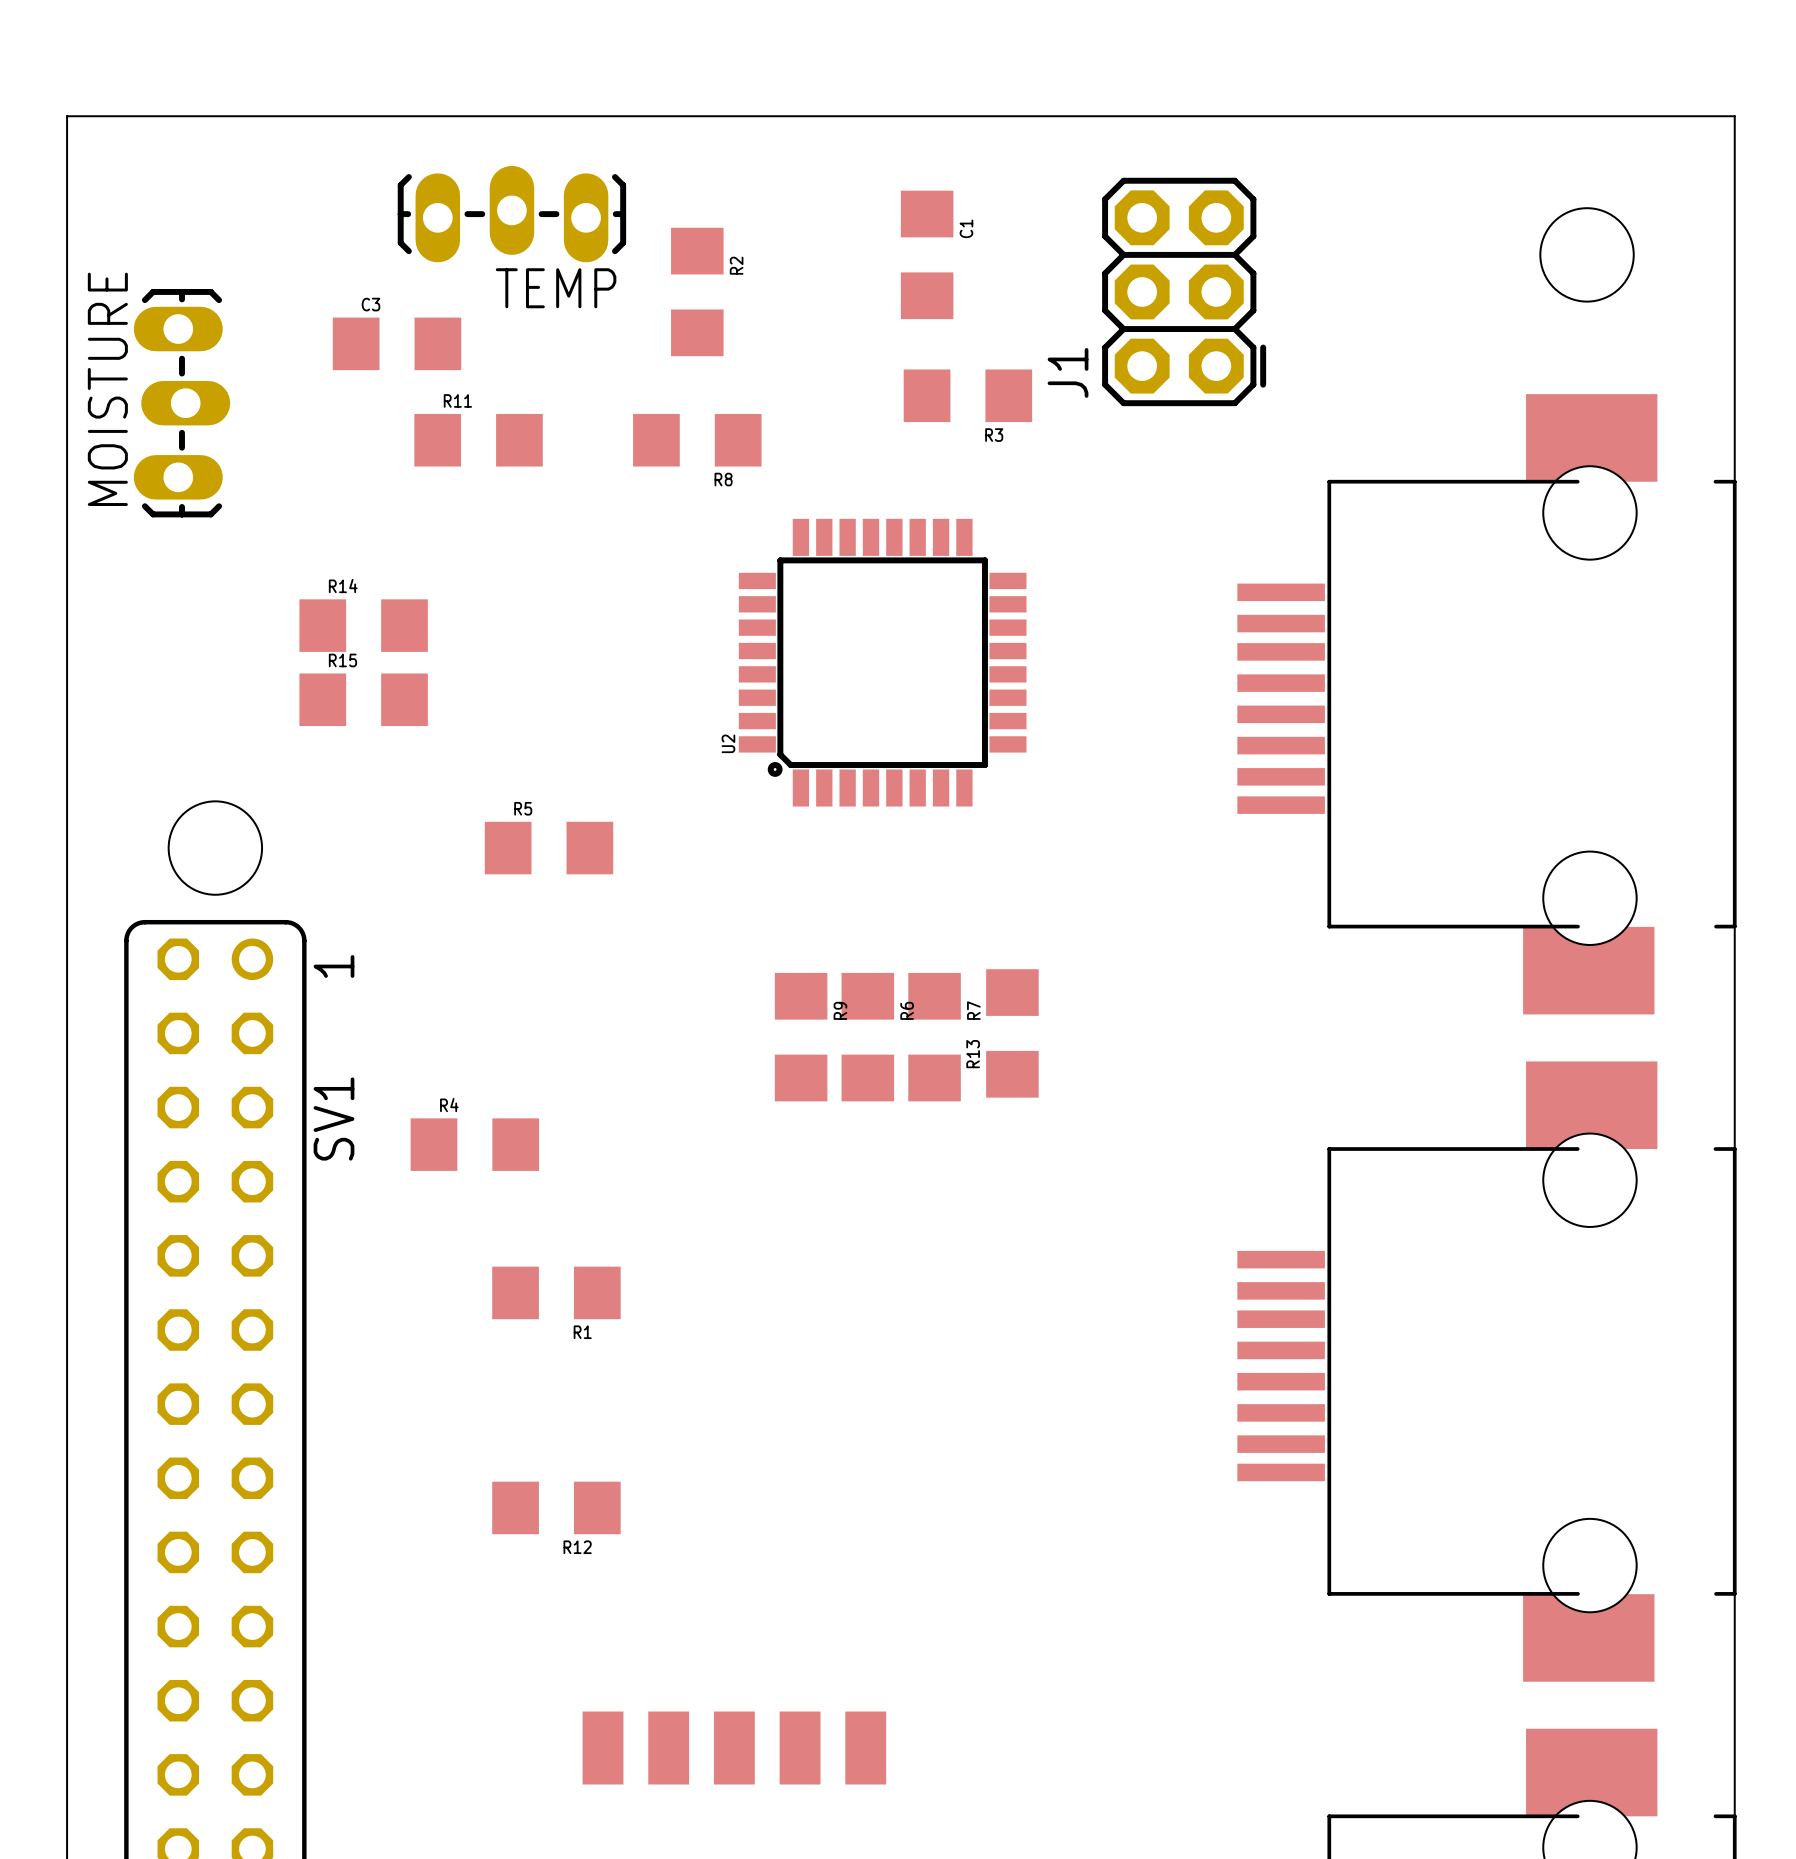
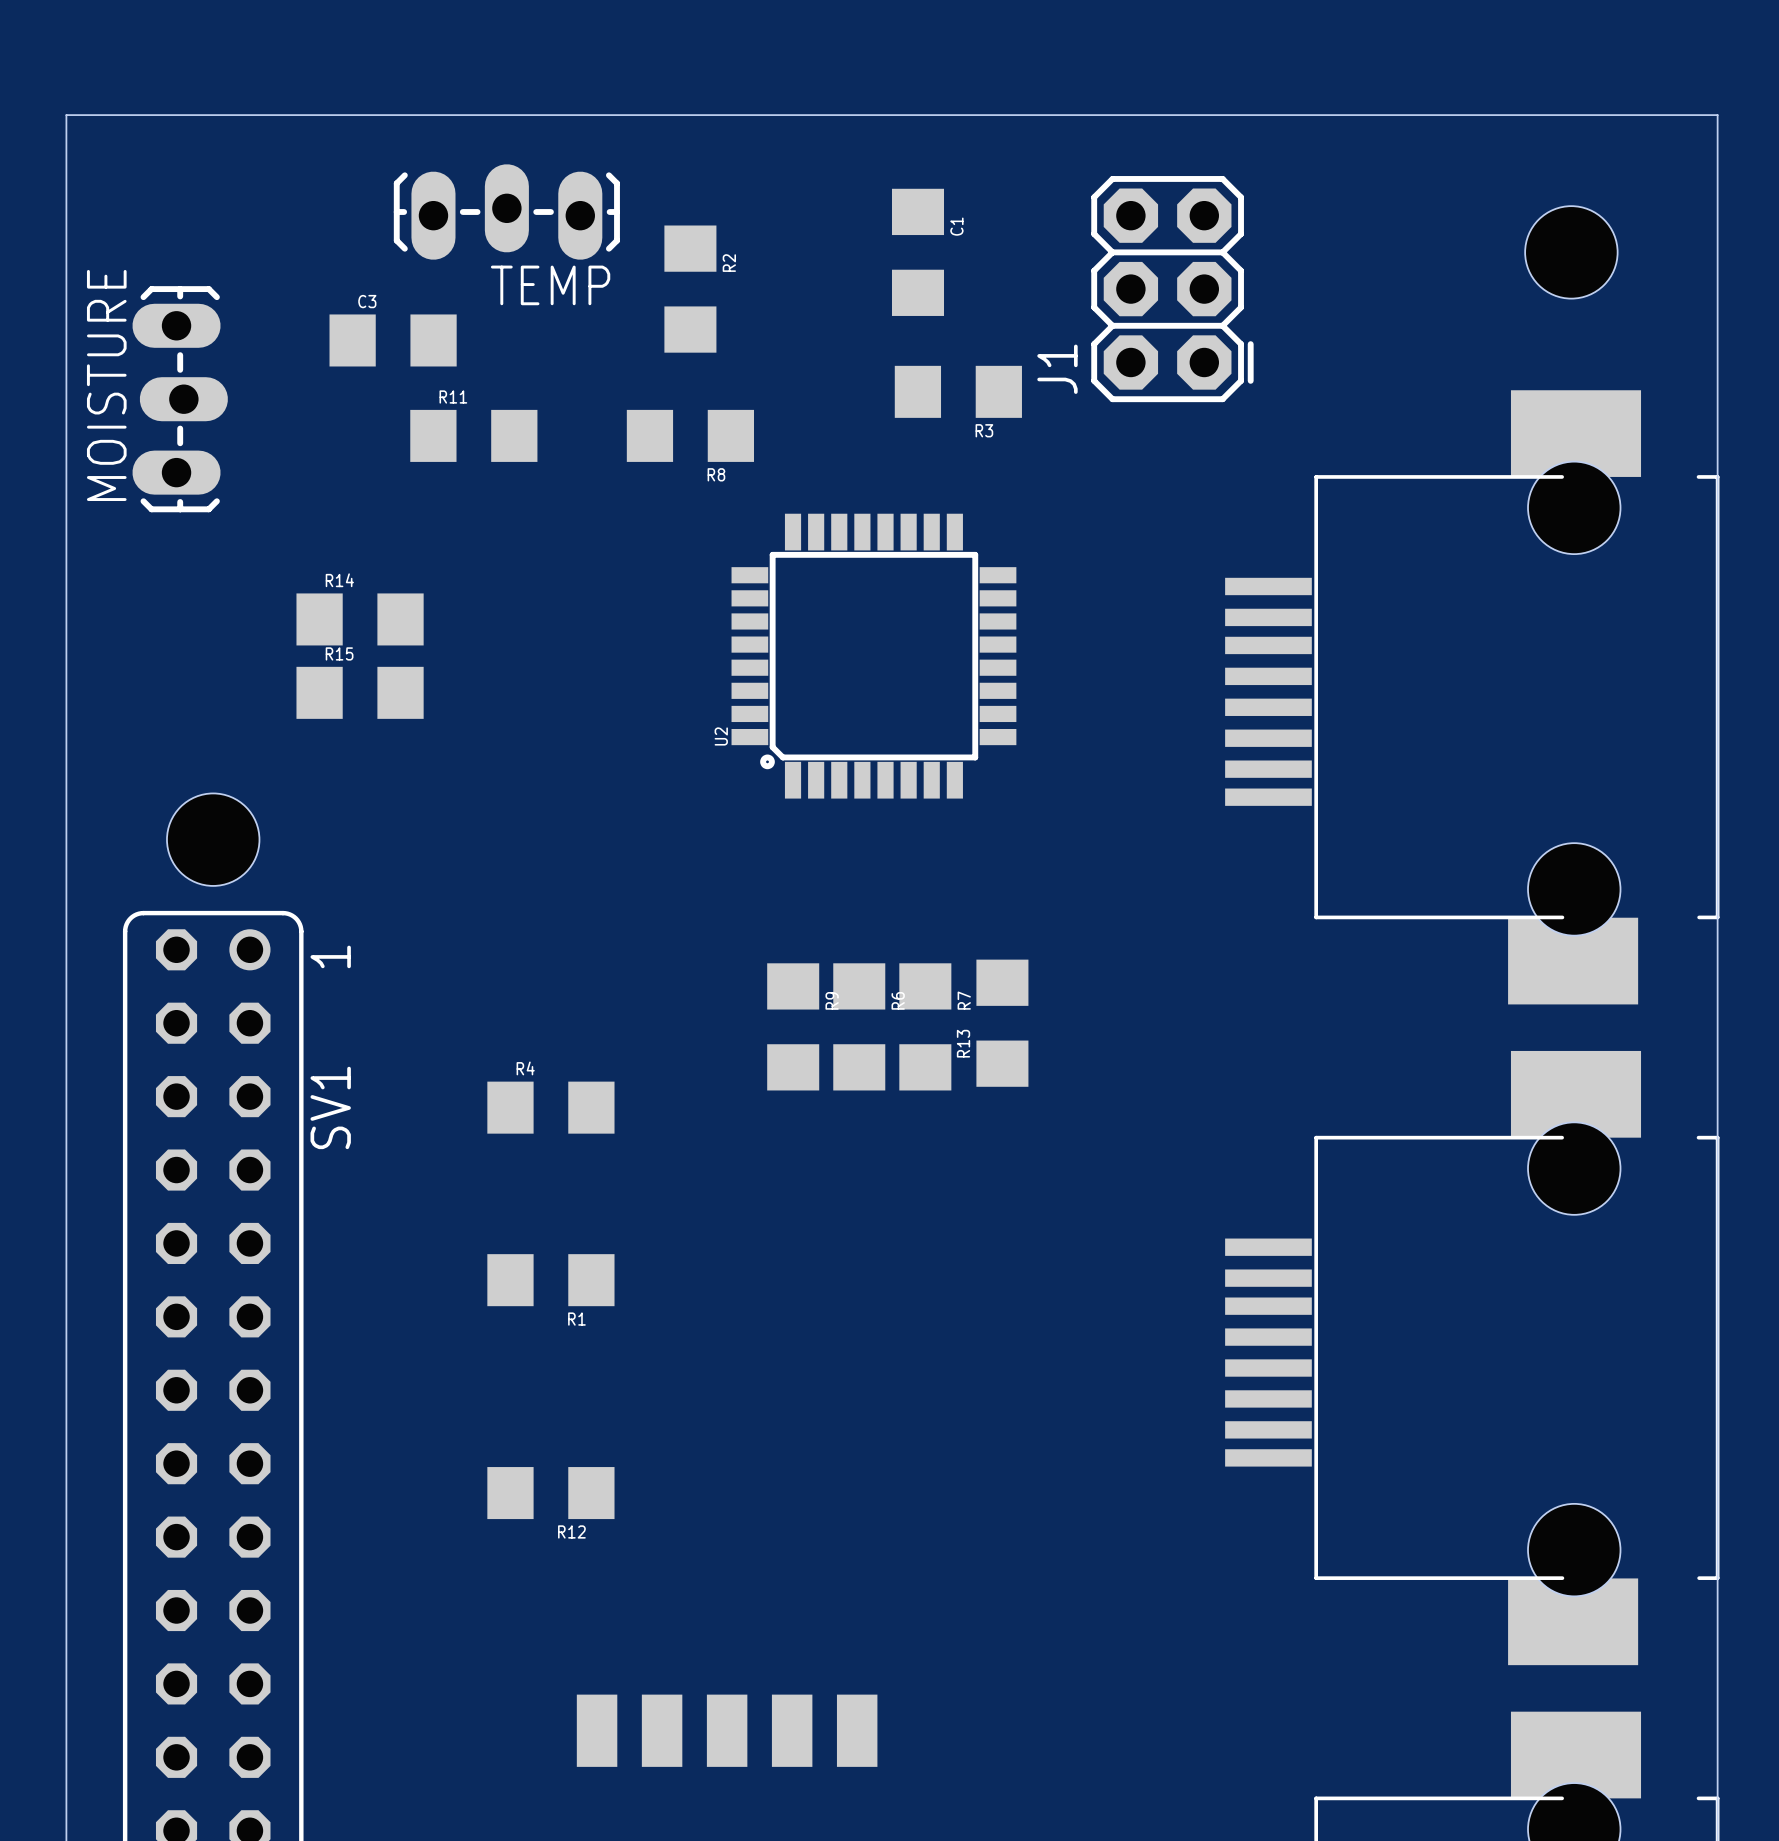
R5: (549, 848) -> none
R4 position: (474, 1144) -> (550, 1107)

